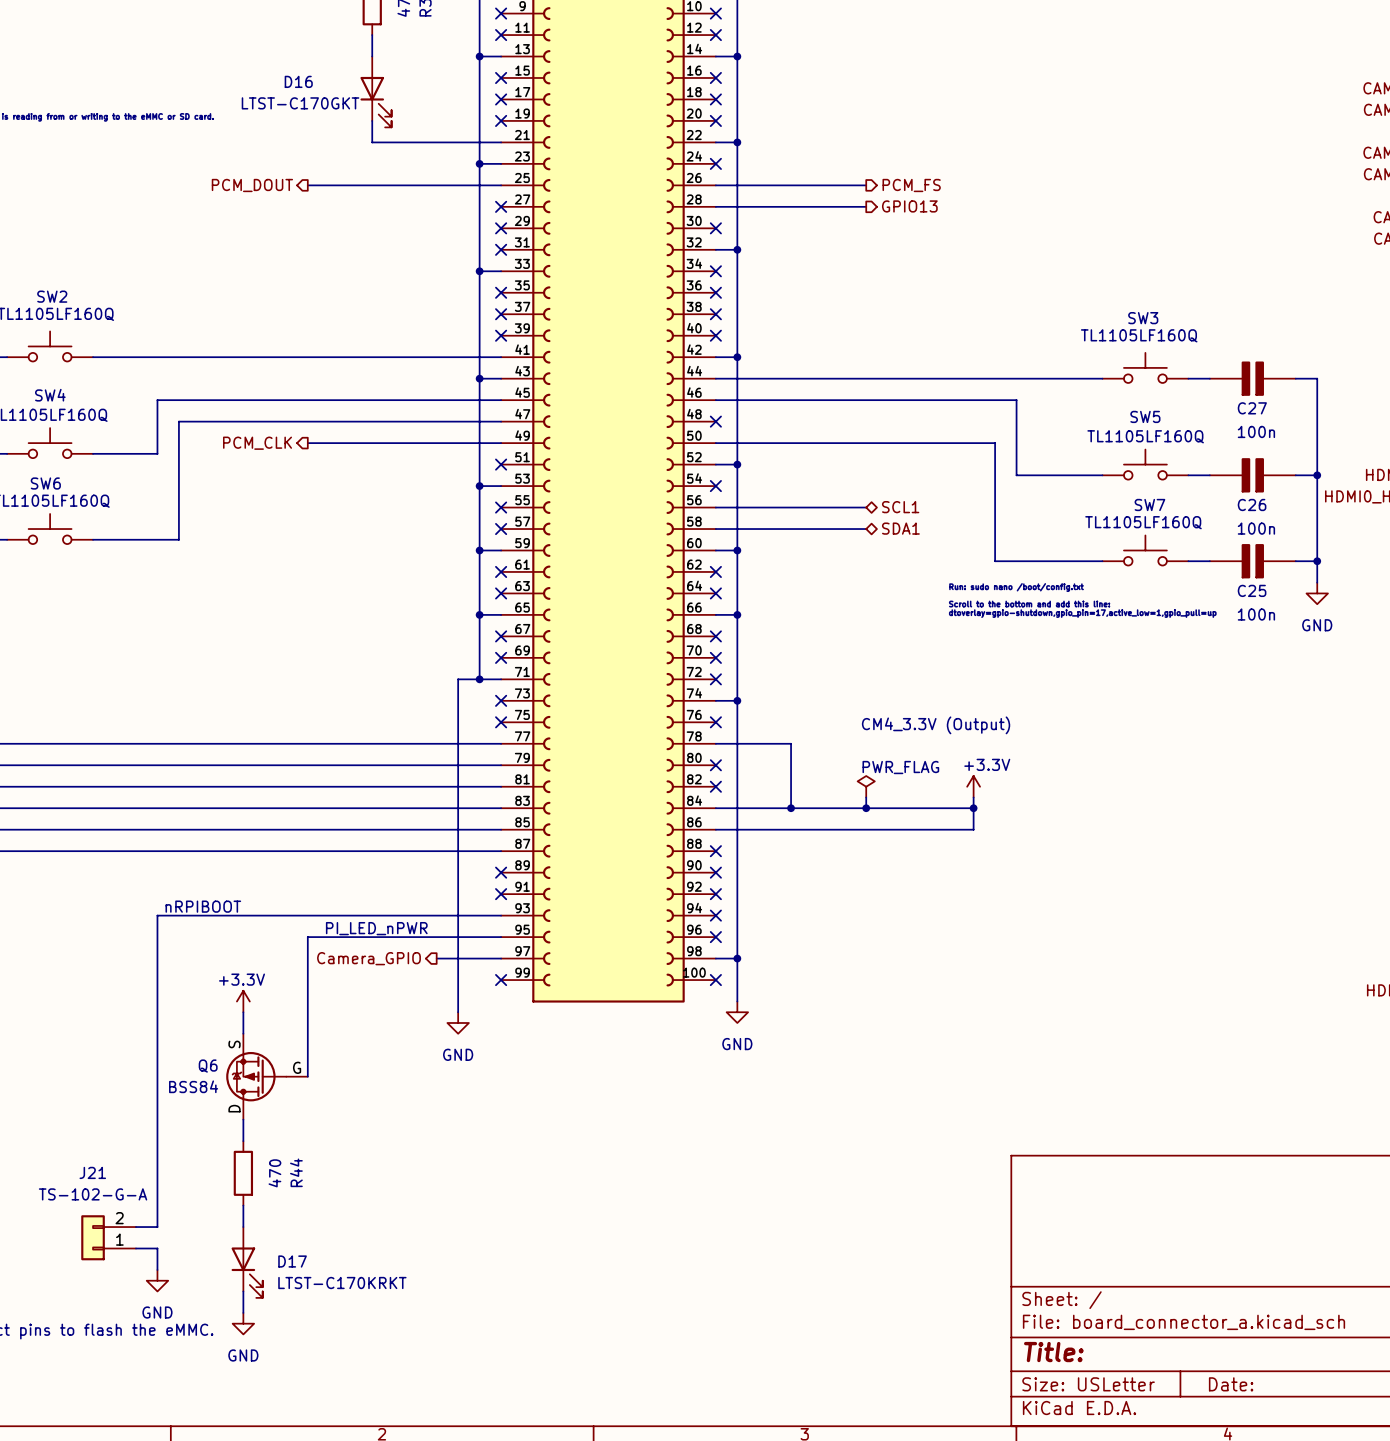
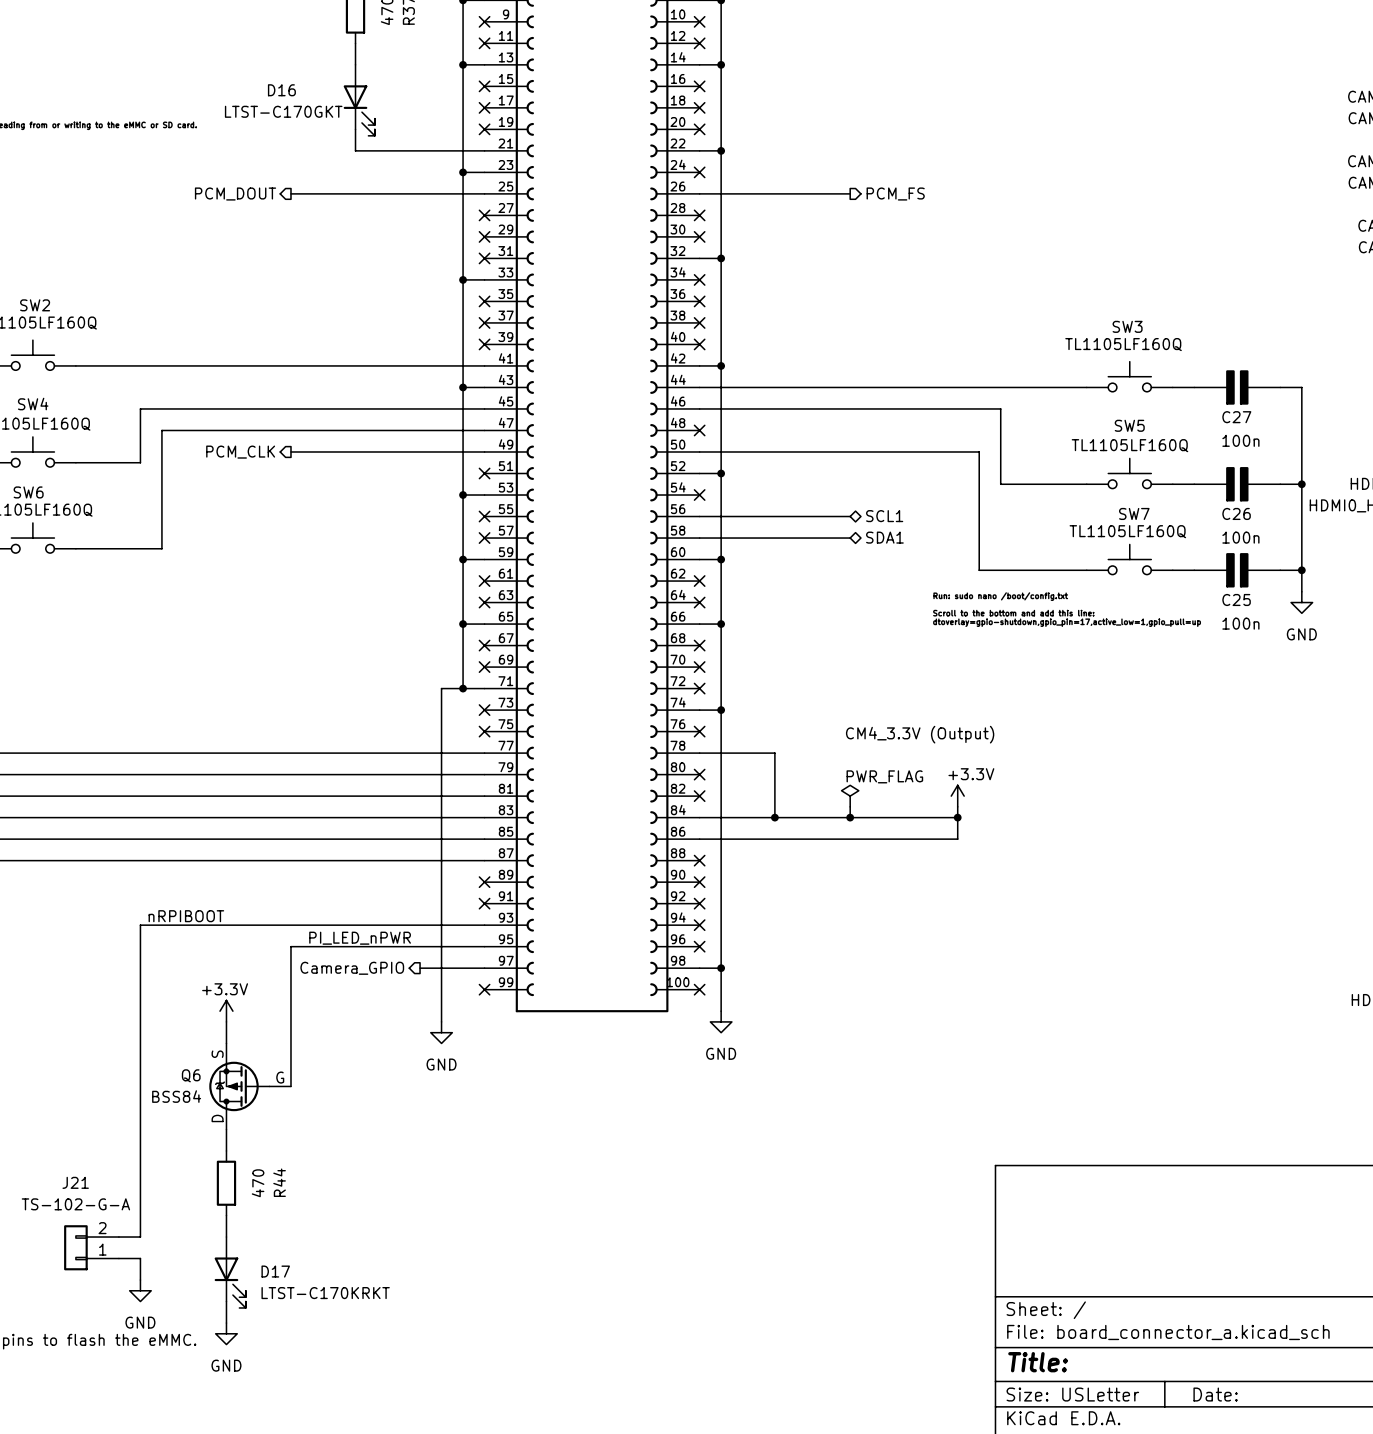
wire: (715, 206) (866, 206) -> none
no-connect mark: none -> (699, 215)
hierarchical label: GPIO13 (909, 206) -> none

